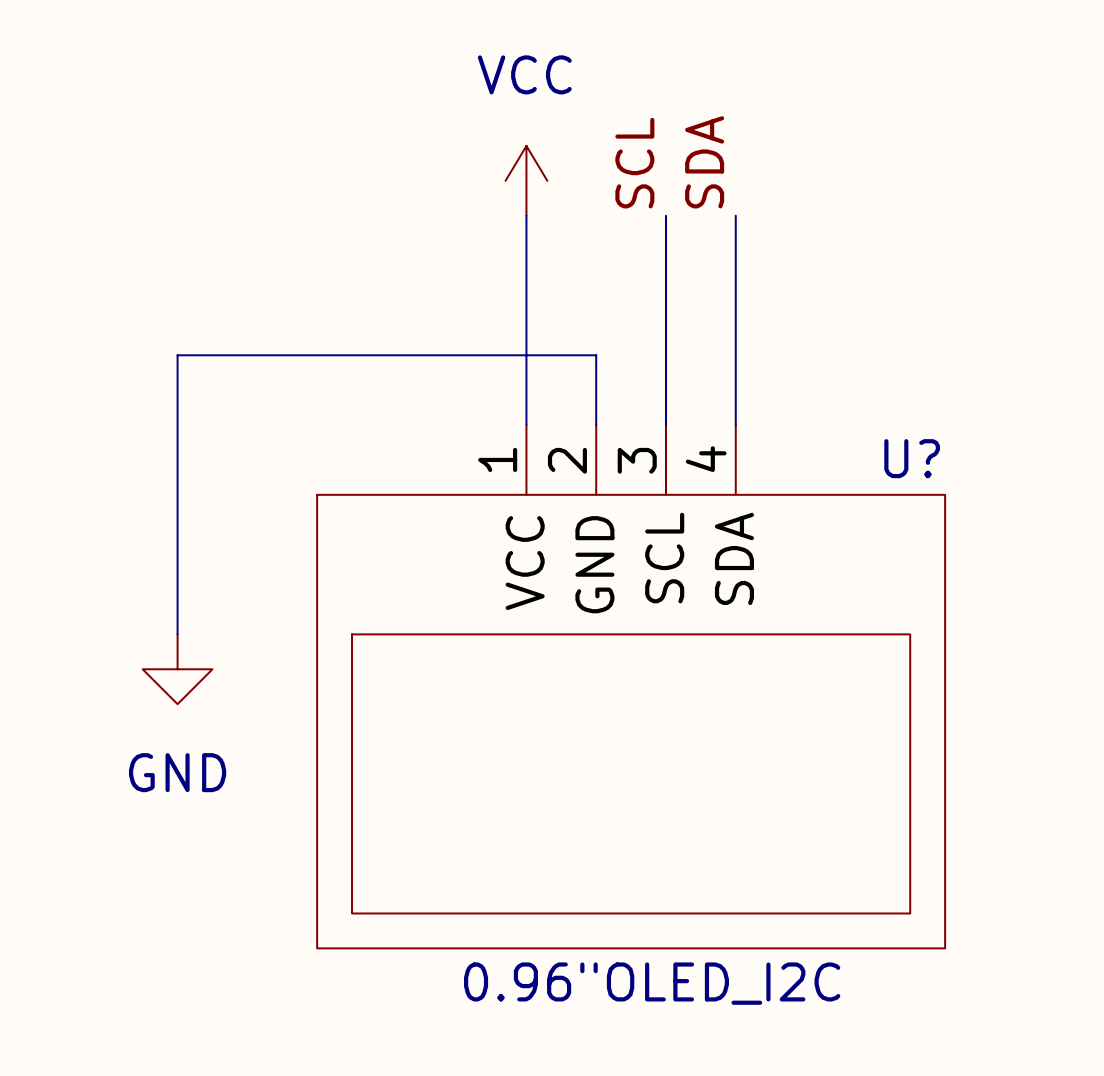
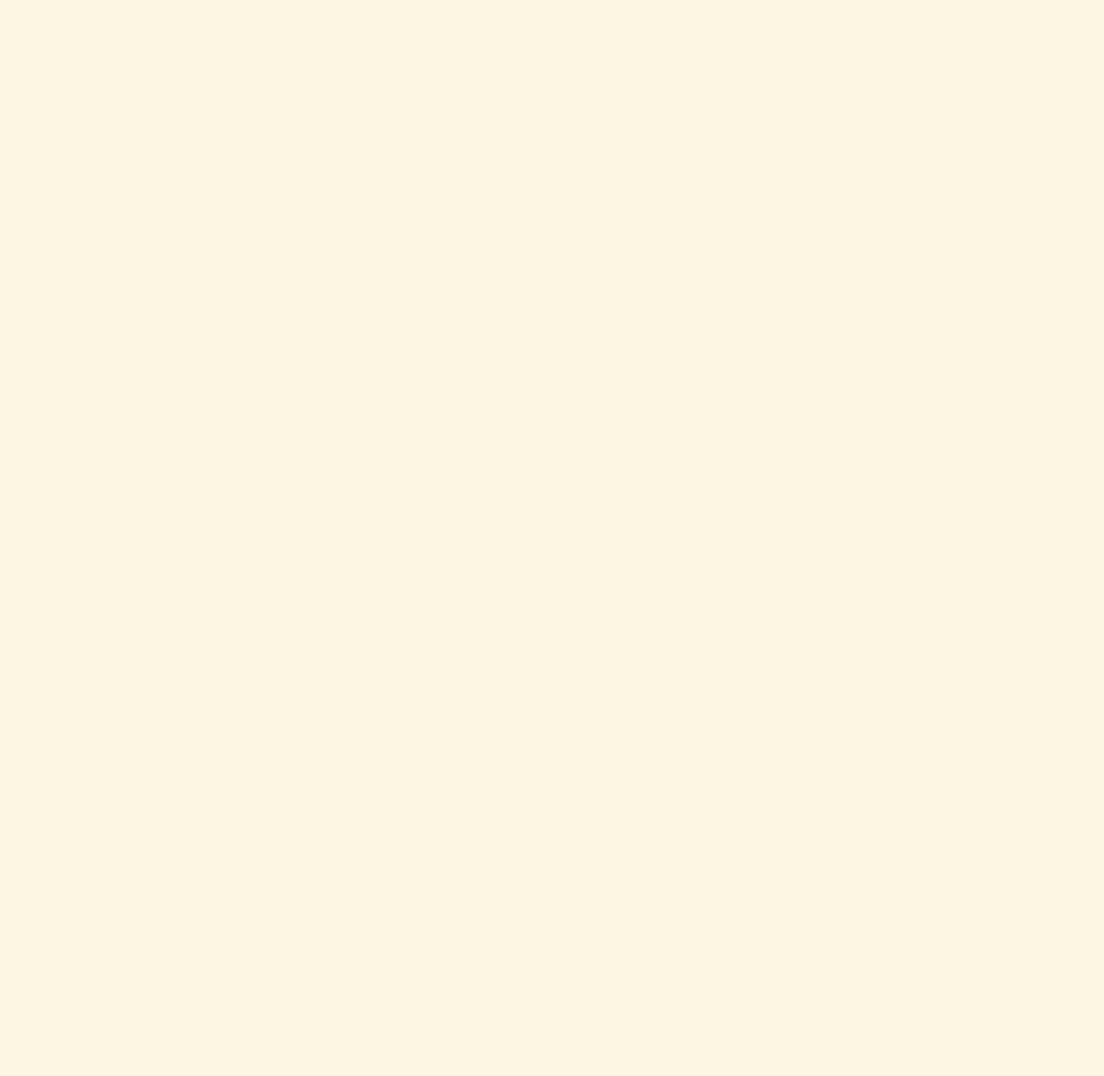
label: SDA (704, 162) -> none
label: SCL (634, 163) -> none
power symbol: VCC (526, 180) -> none
wire: (526, 215) (526, 425) -> none
wire: (666, 215) (666, 425) -> none
wire: (735, 215) (735, 425) -> none
wire: (596, 425) (596, 355) (177, 355) (177, 634) -> none
power symbol: GND (177, 669) -> none
U?: 0.96"OLED_I2C (631, 686) -> none

